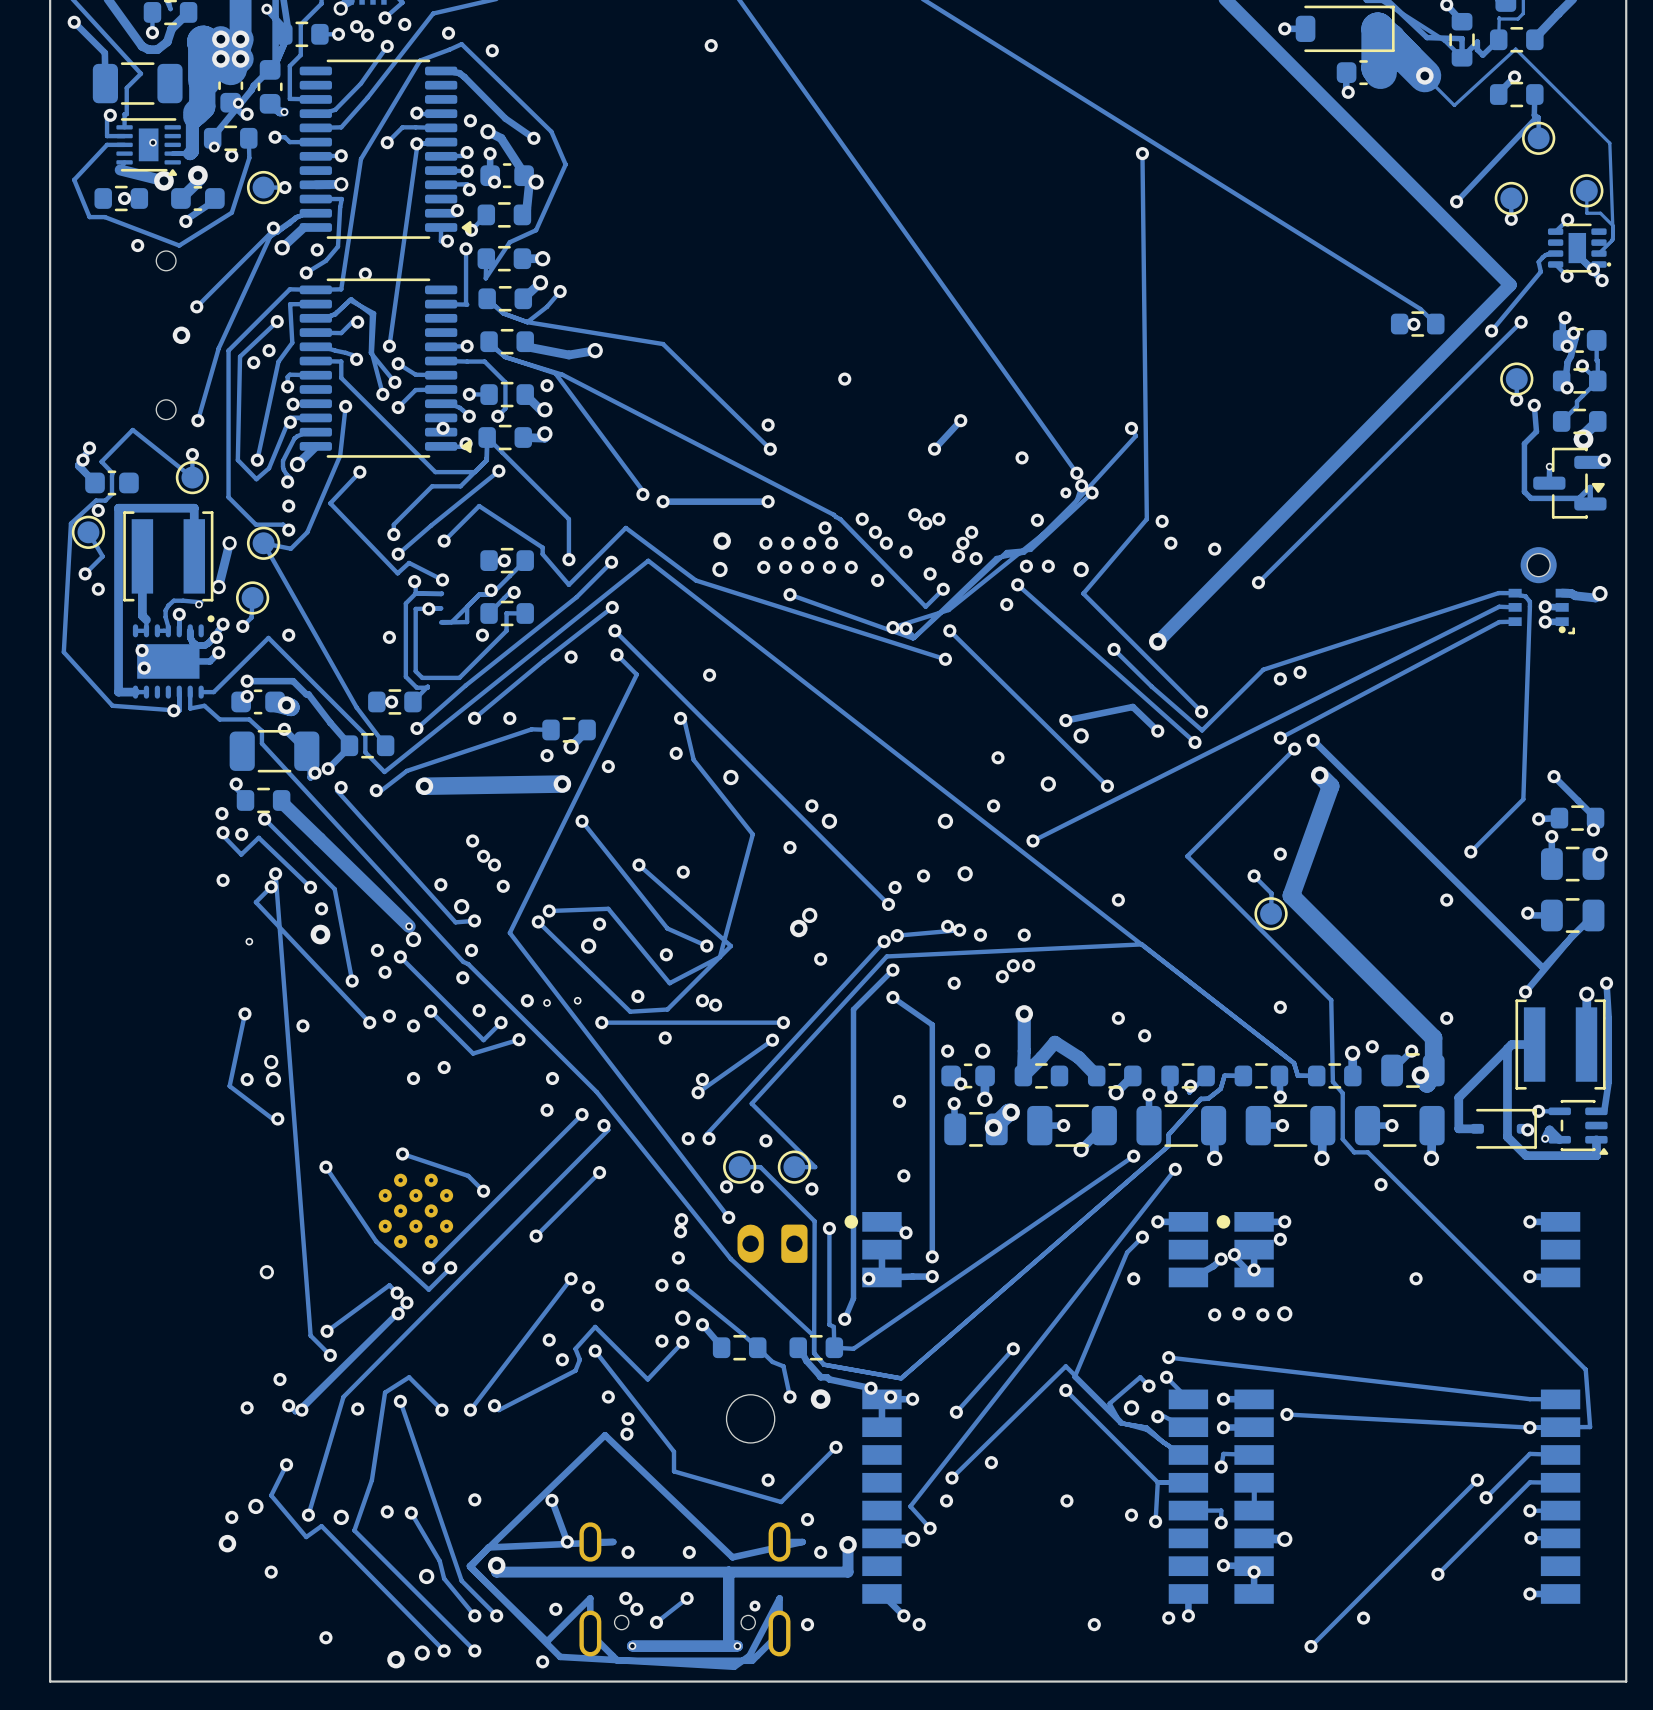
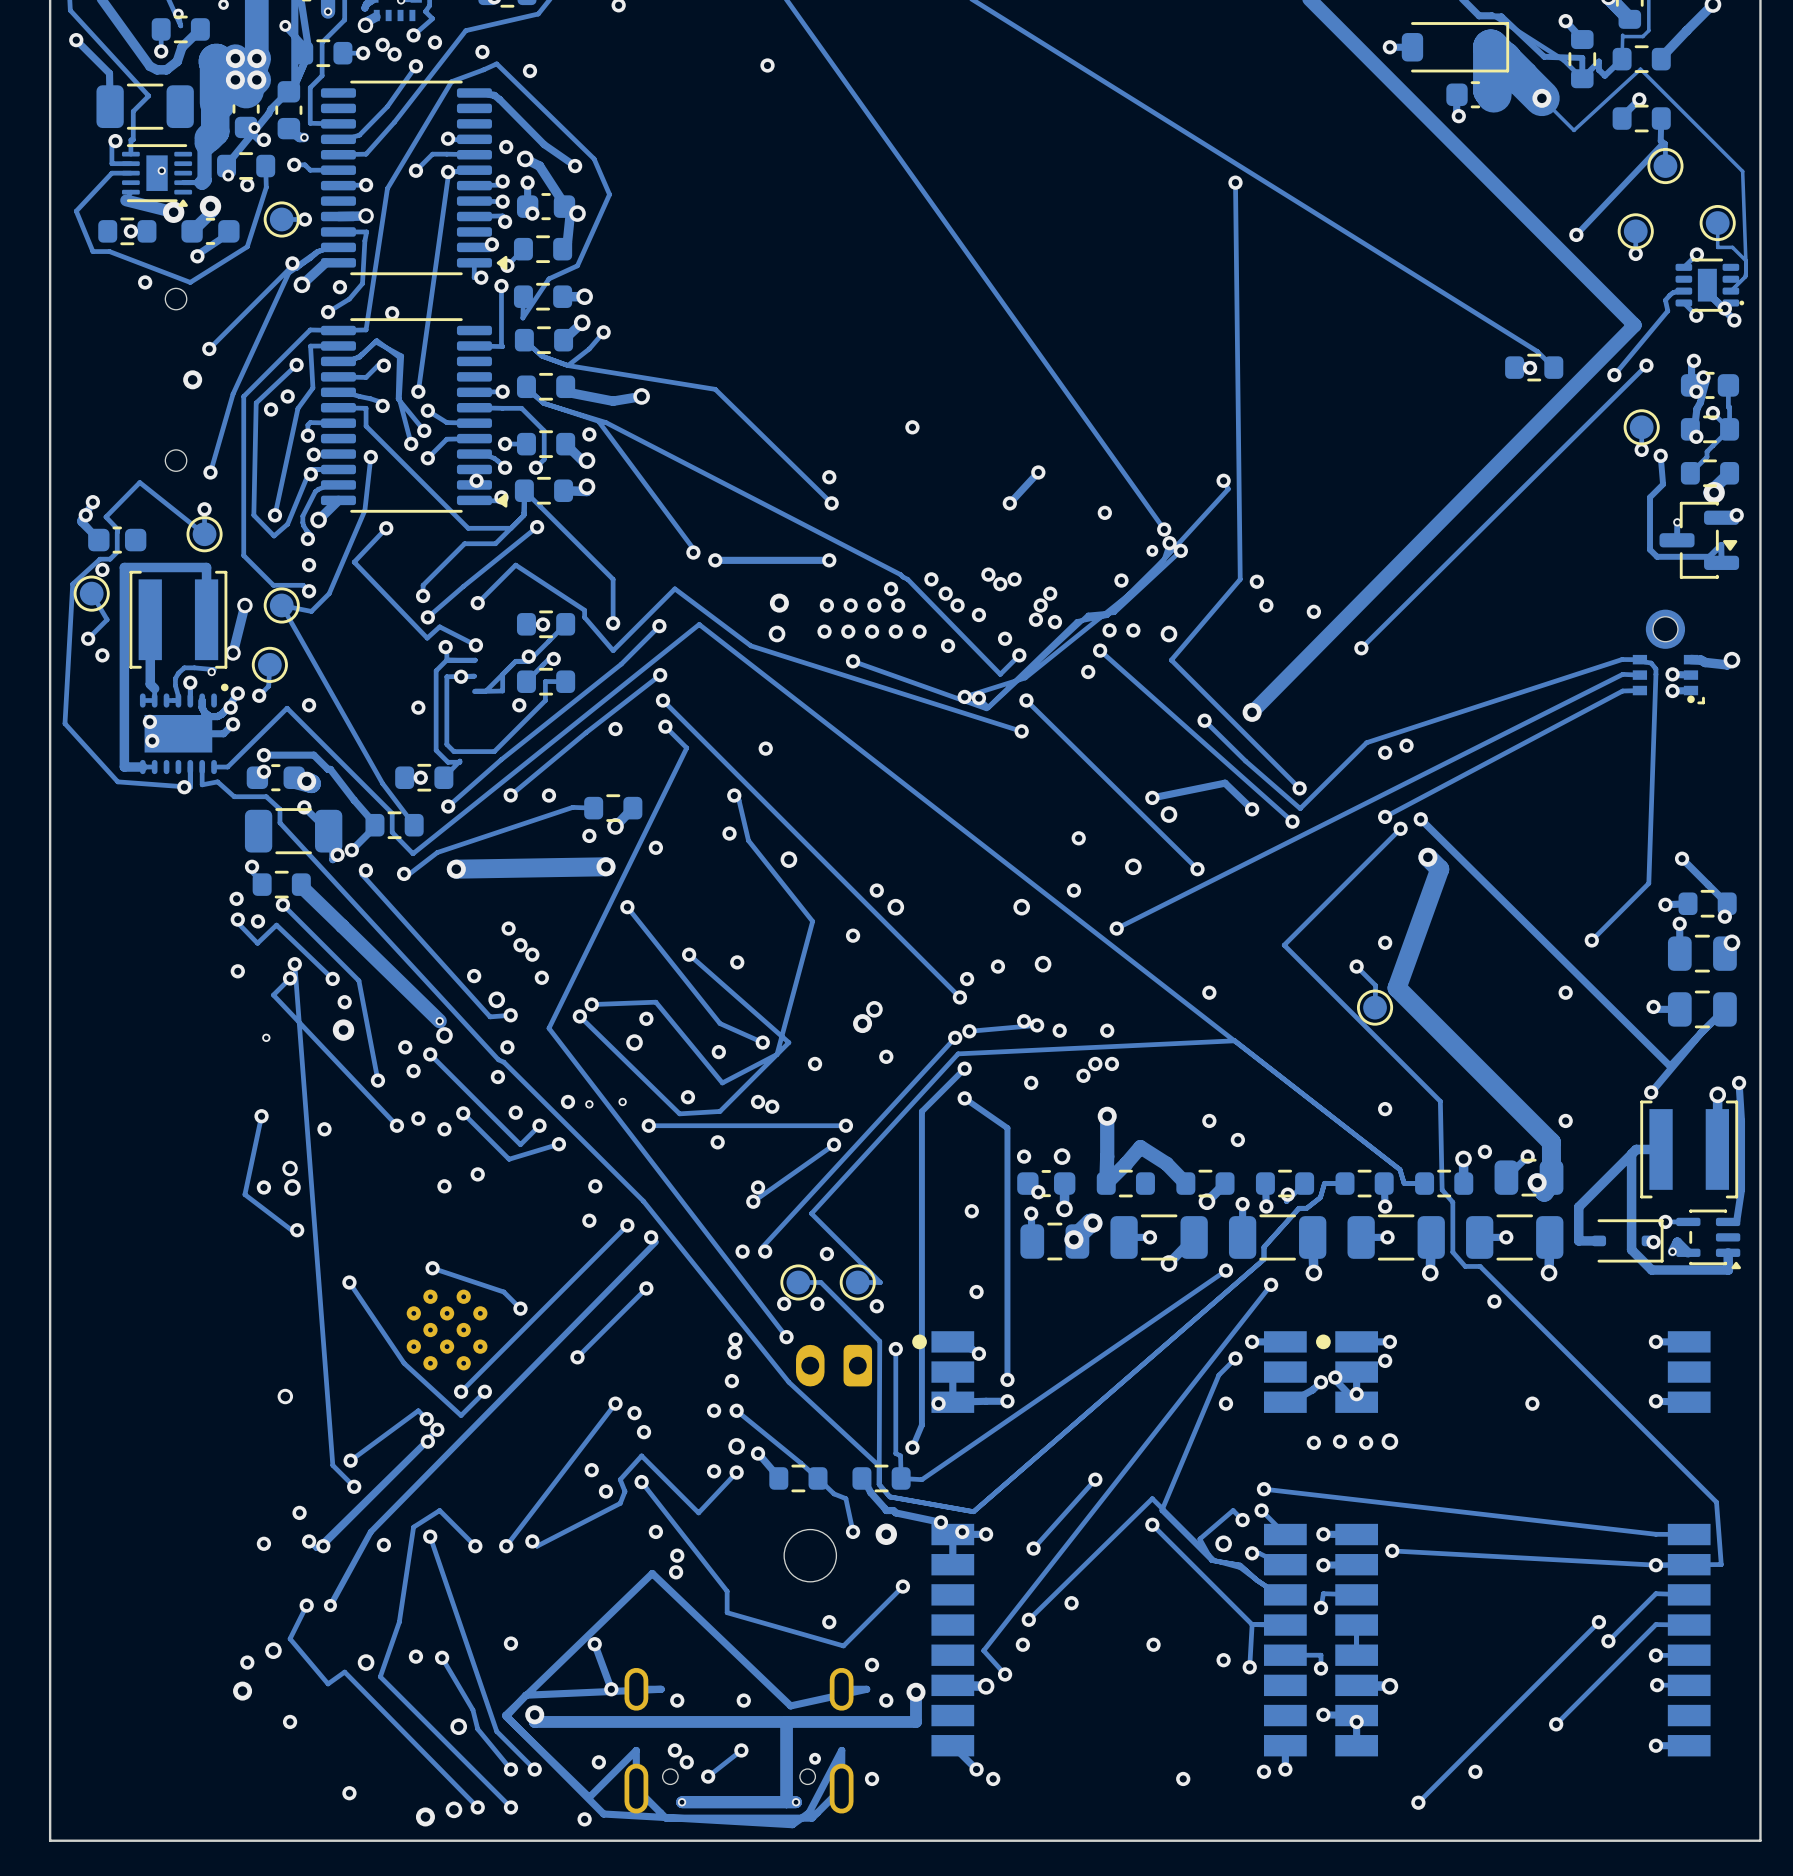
via: none -> (815, 1063)
track: (608, 1129) (343, 1396) (308, 1515) -> (655, 1242) (370, 1531) (330, 1605)
via: none -> (330, 1605)
via: (308, 1515) -> none

